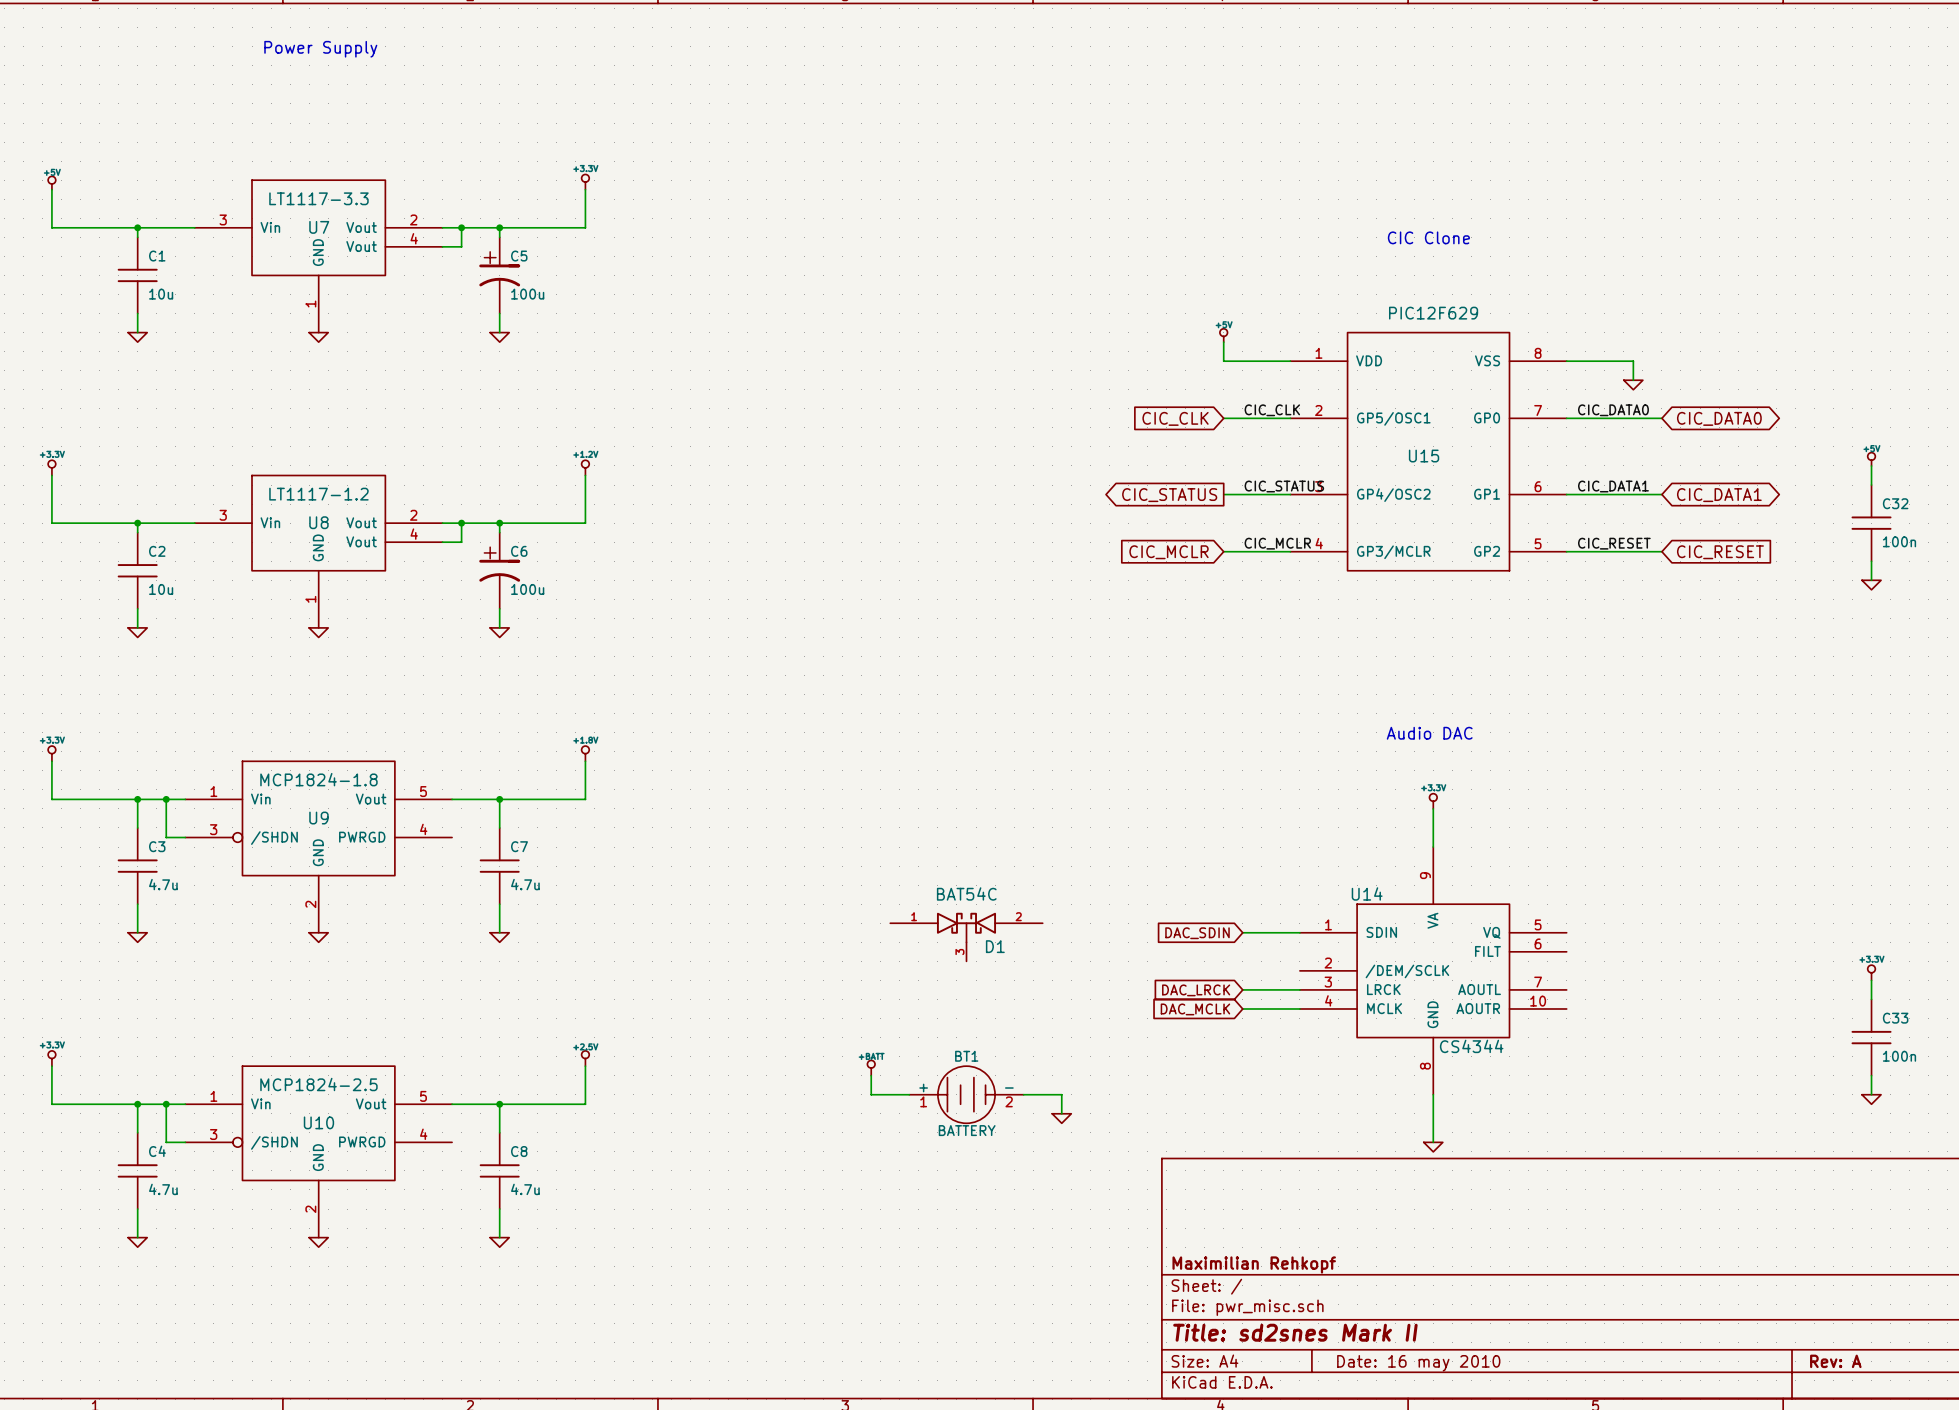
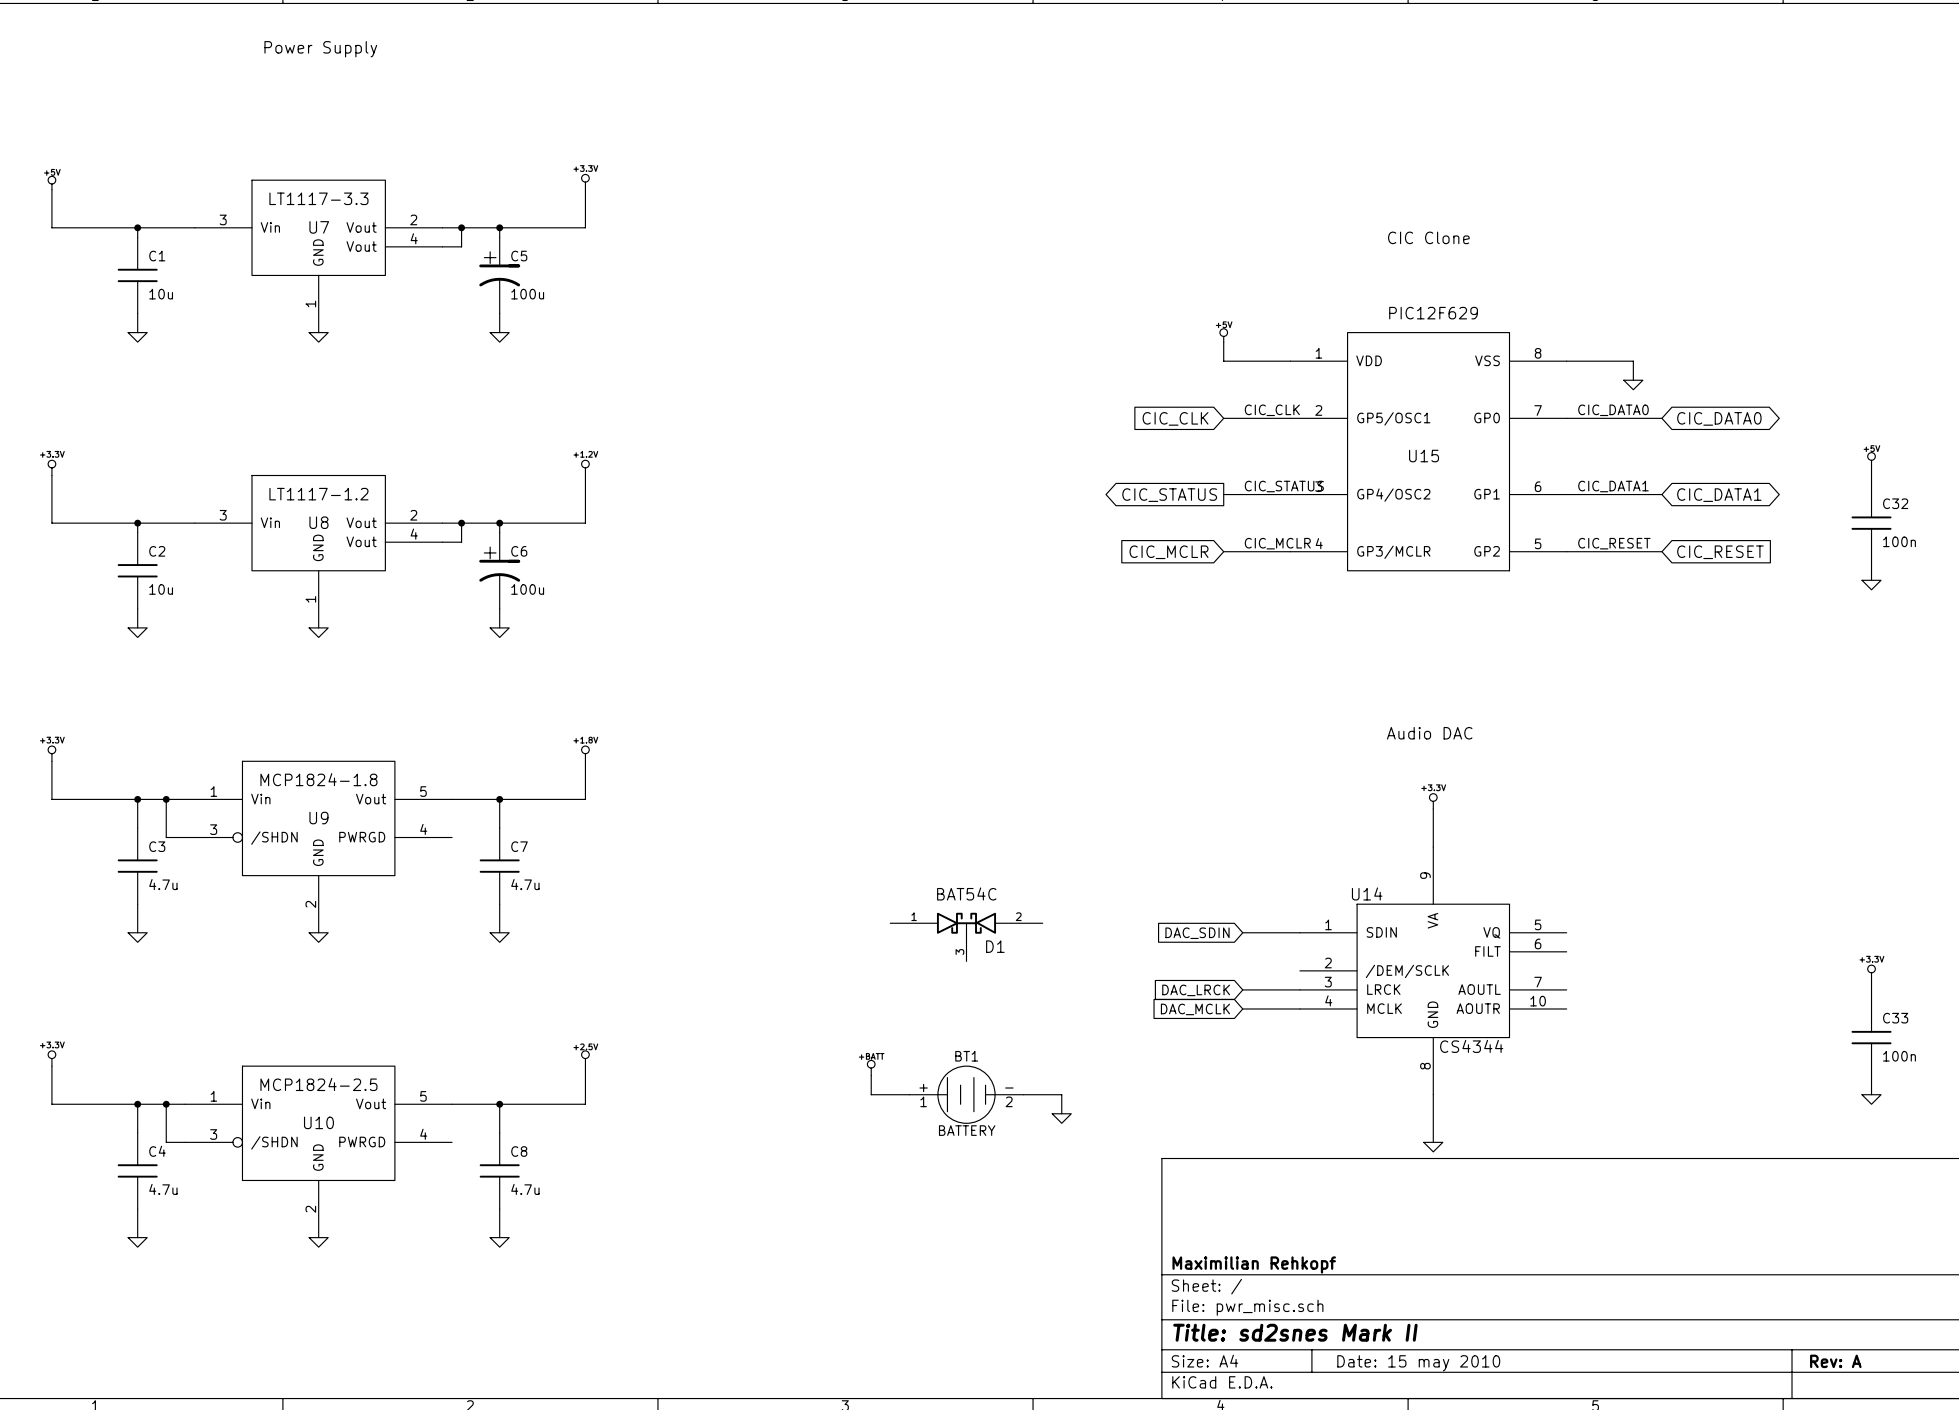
title block: Date: 16 may 2010 (1418, 1363) -> Date: 15 may 2010 (1418, 1363)

